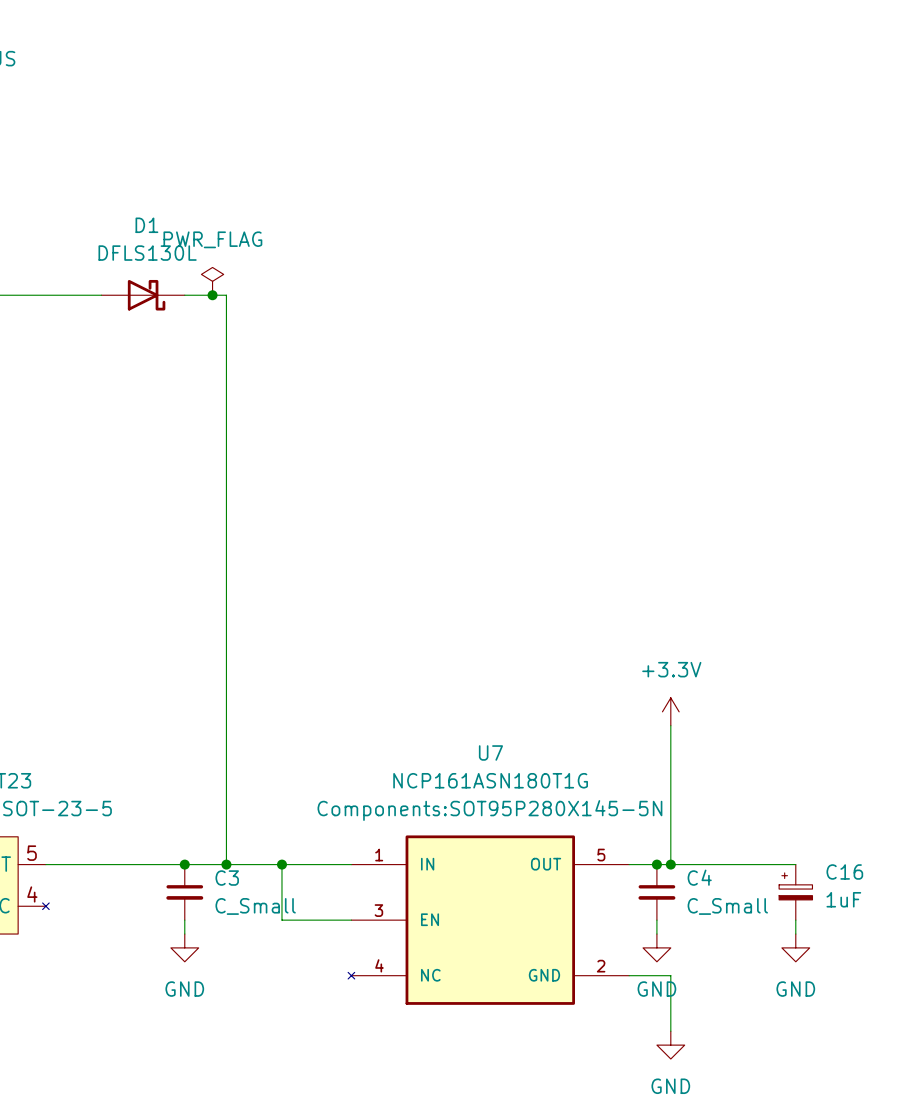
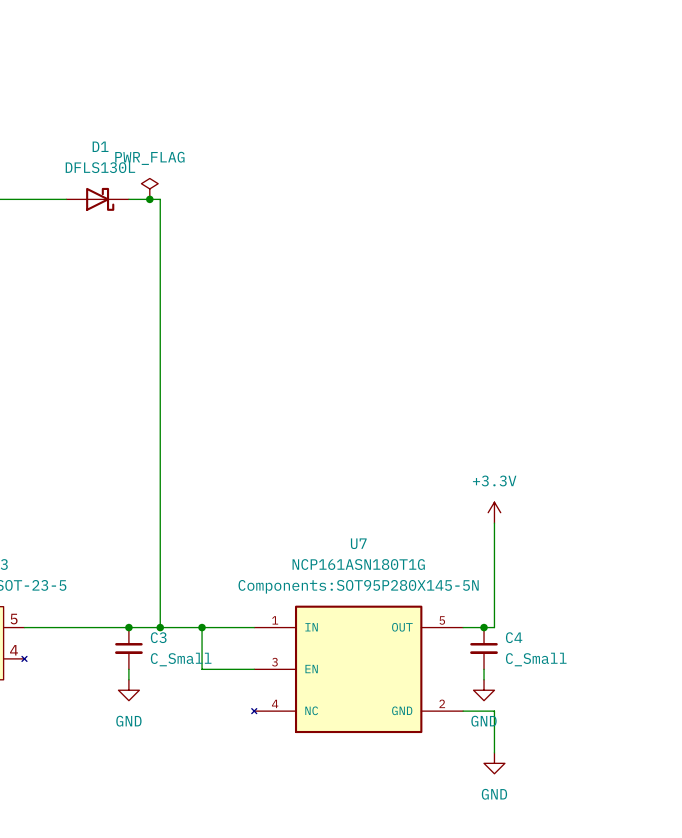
wire: (670, 864) (795, 864) -> none
junction: (670, 864) -> none
C16: 1uF (795, 892) -> none
wire: (795, 920) (795, 934) -> none
power symbol: GND (795, 947) -> none

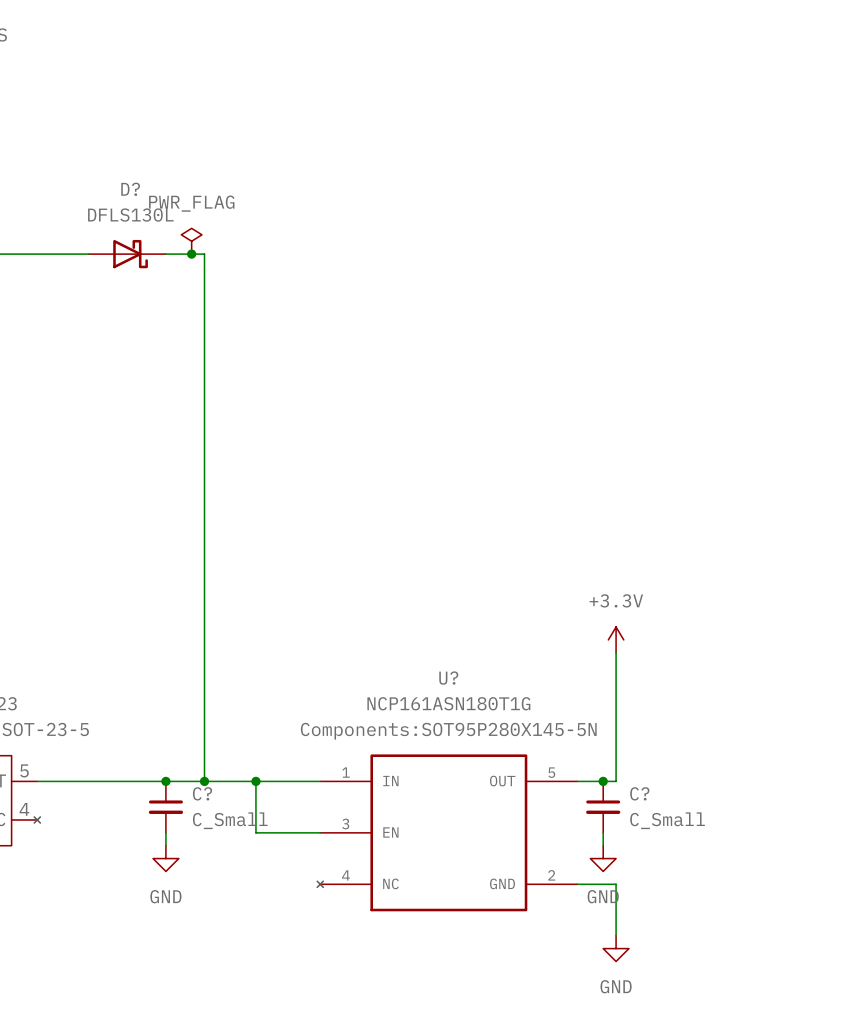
D1 name: D1 (100, 146) -> D? (130, 189)
U7 name: U7 (358, 543) -> U? (448, 678)
C3 name: C3 (158, 637) -> C? (202, 793)
C4 name: C4 (514, 637) -> C? (639, 793)

